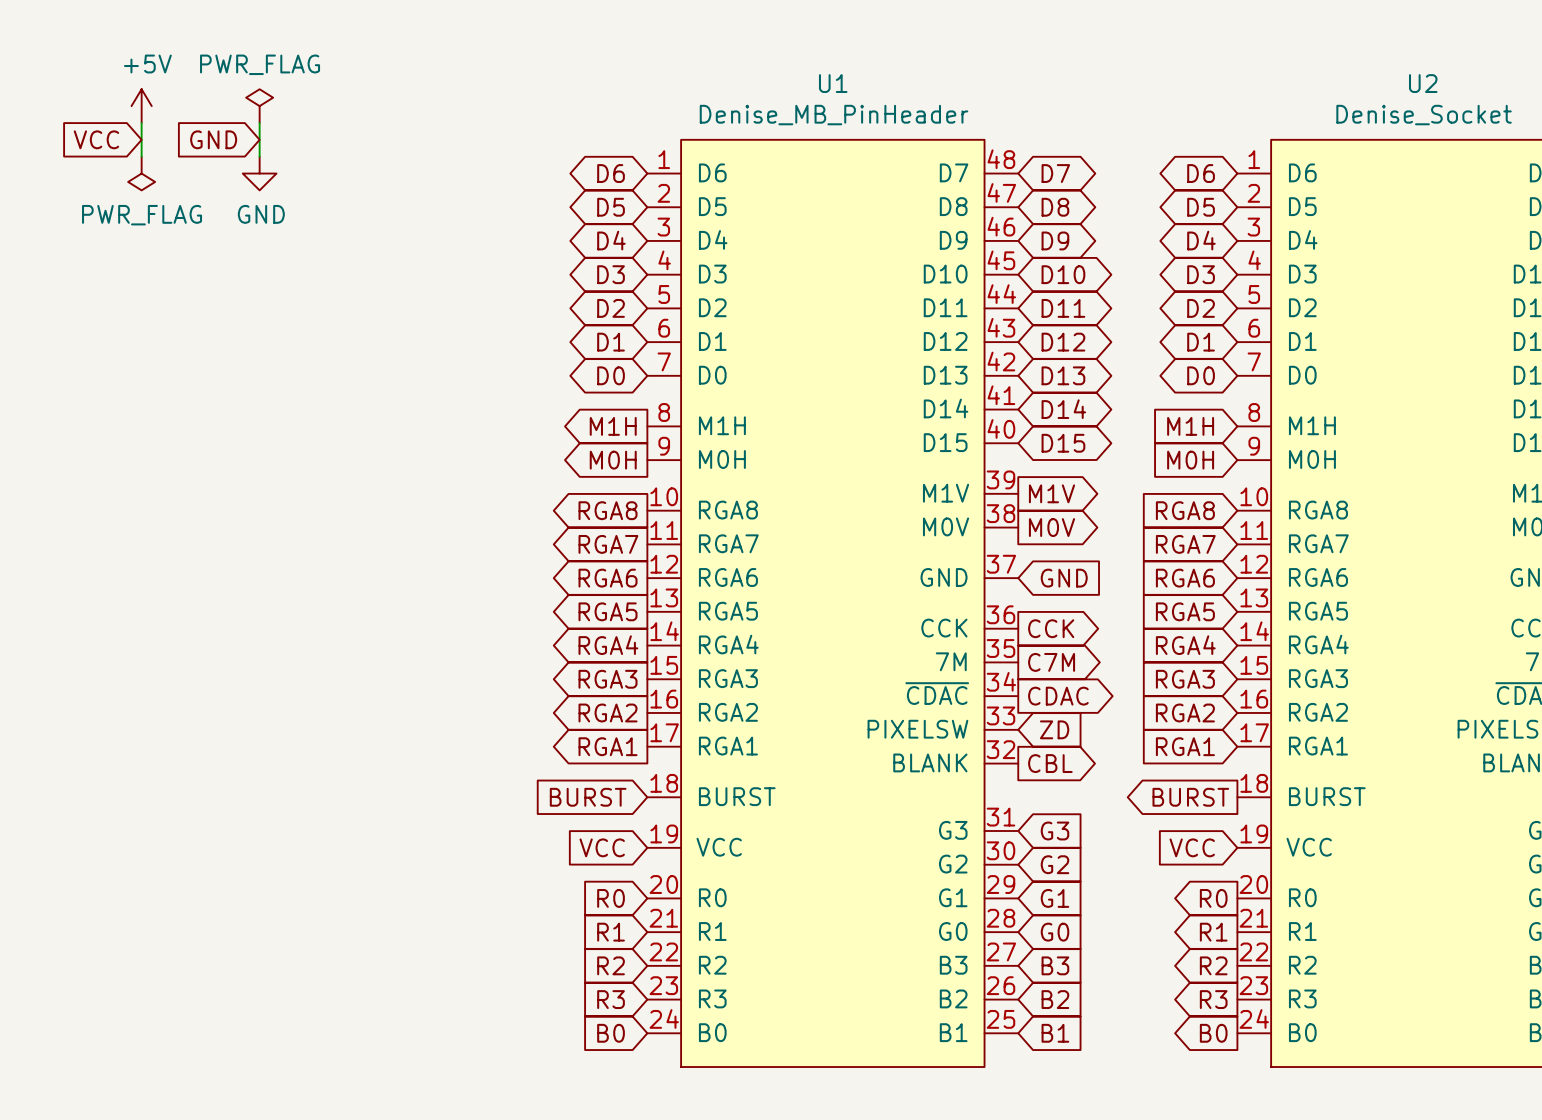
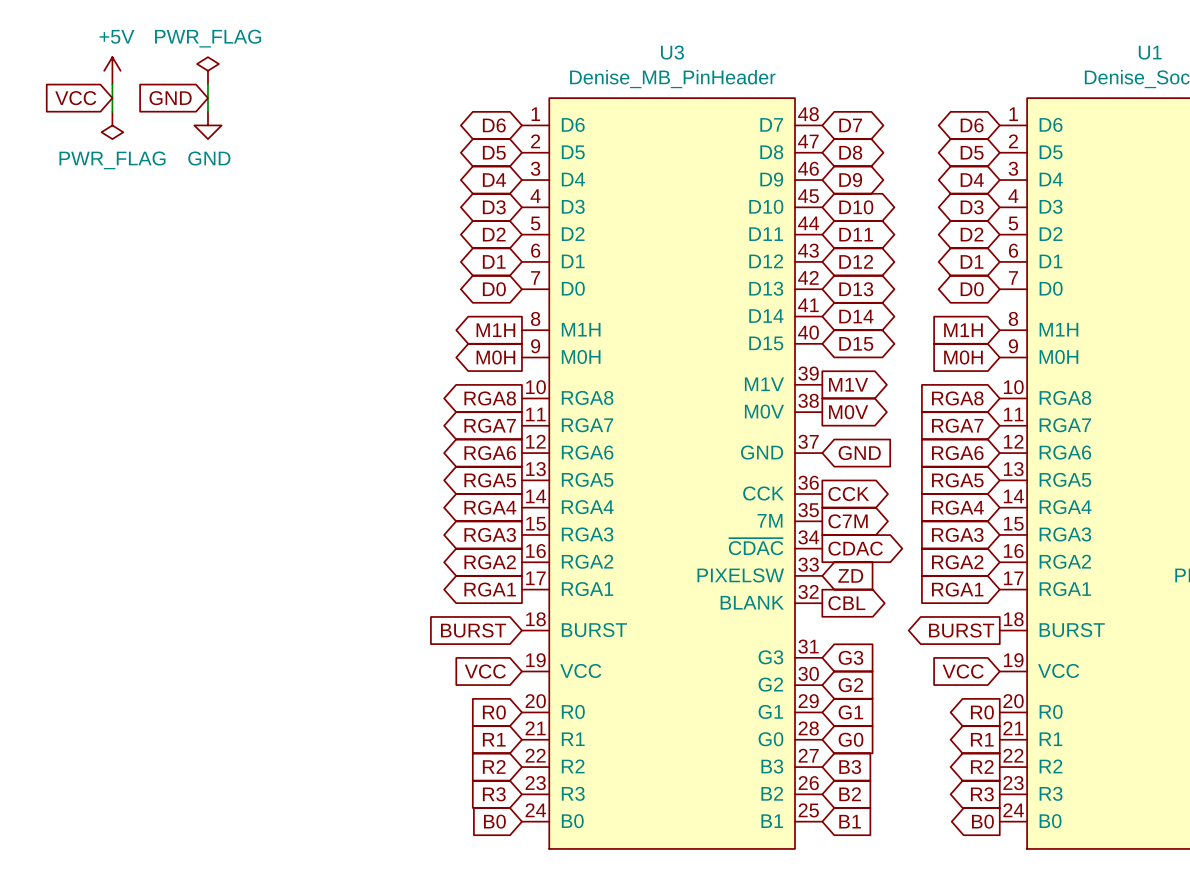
U1 name: U1 (833, 83) -> U3 (672, 52)
U2 name: U2 (1423, 83) -> U1 (1150, 52)

